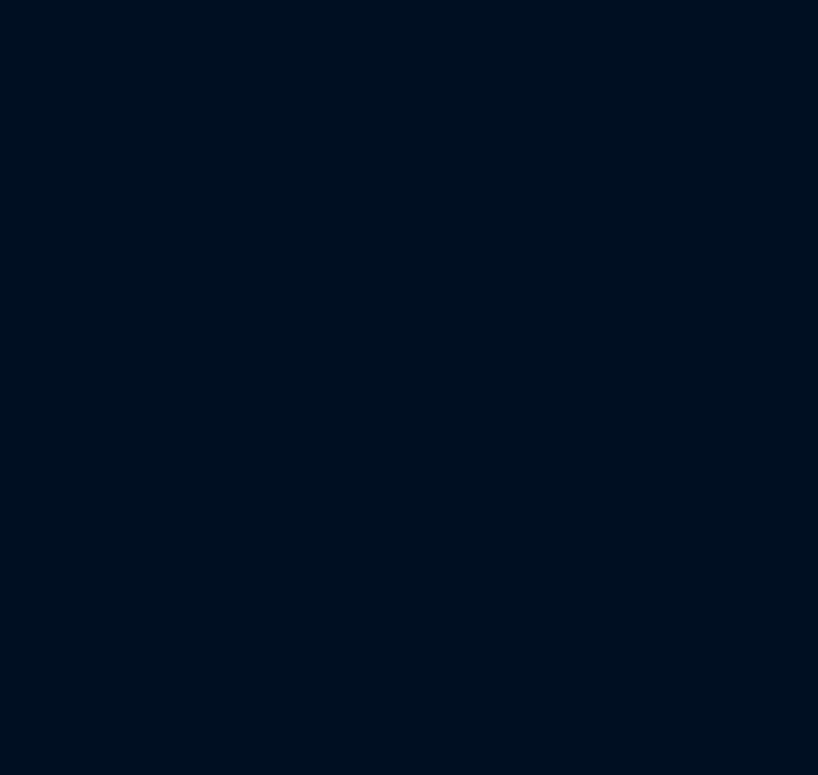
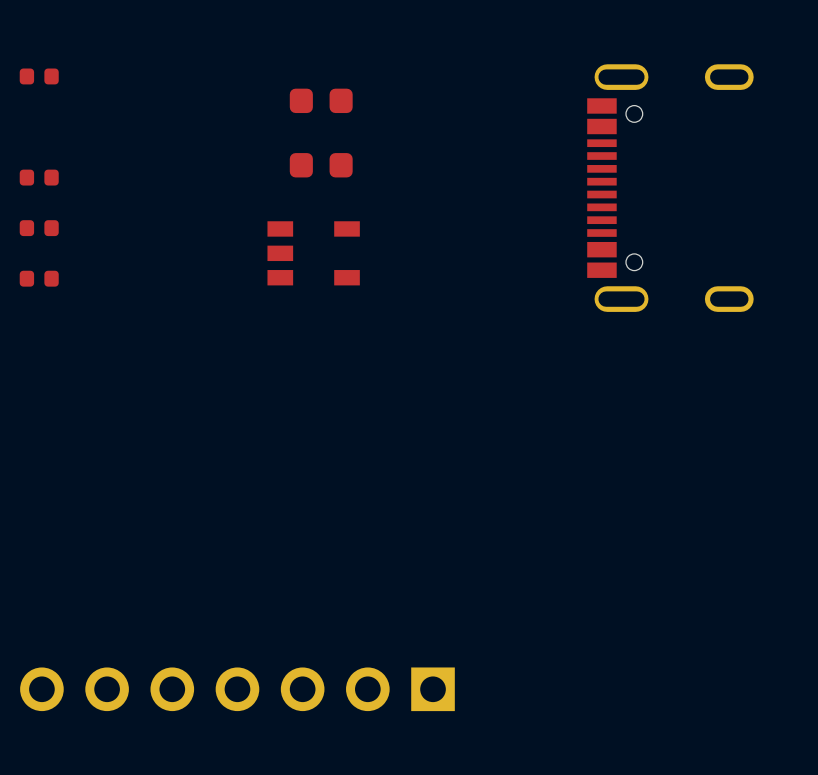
part: none -> (39, 76)
part: none -> (321, 100)
part: none -> (321, 165)
part: none -> (39, 177)
part: none -> (670, 188)
part: none -> (39, 228)
part: none -> (313, 253)
part: none -> (39, 278)
part: none -> (237, 689)

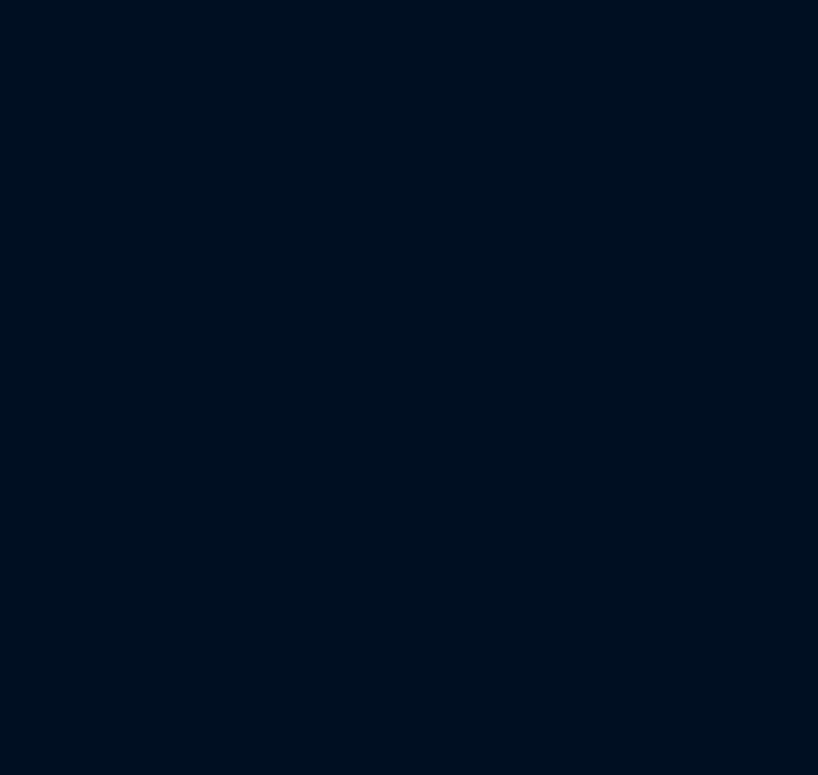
part: (39, 76) -> none
part: (321, 100) -> none
part: (321, 165) -> none
part: (39, 177) -> none
part: (670, 188) -> none
part: (39, 228) -> none
part: (313, 253) -> none
part: (39, 278) -> none
part: (237, 689) -> none

